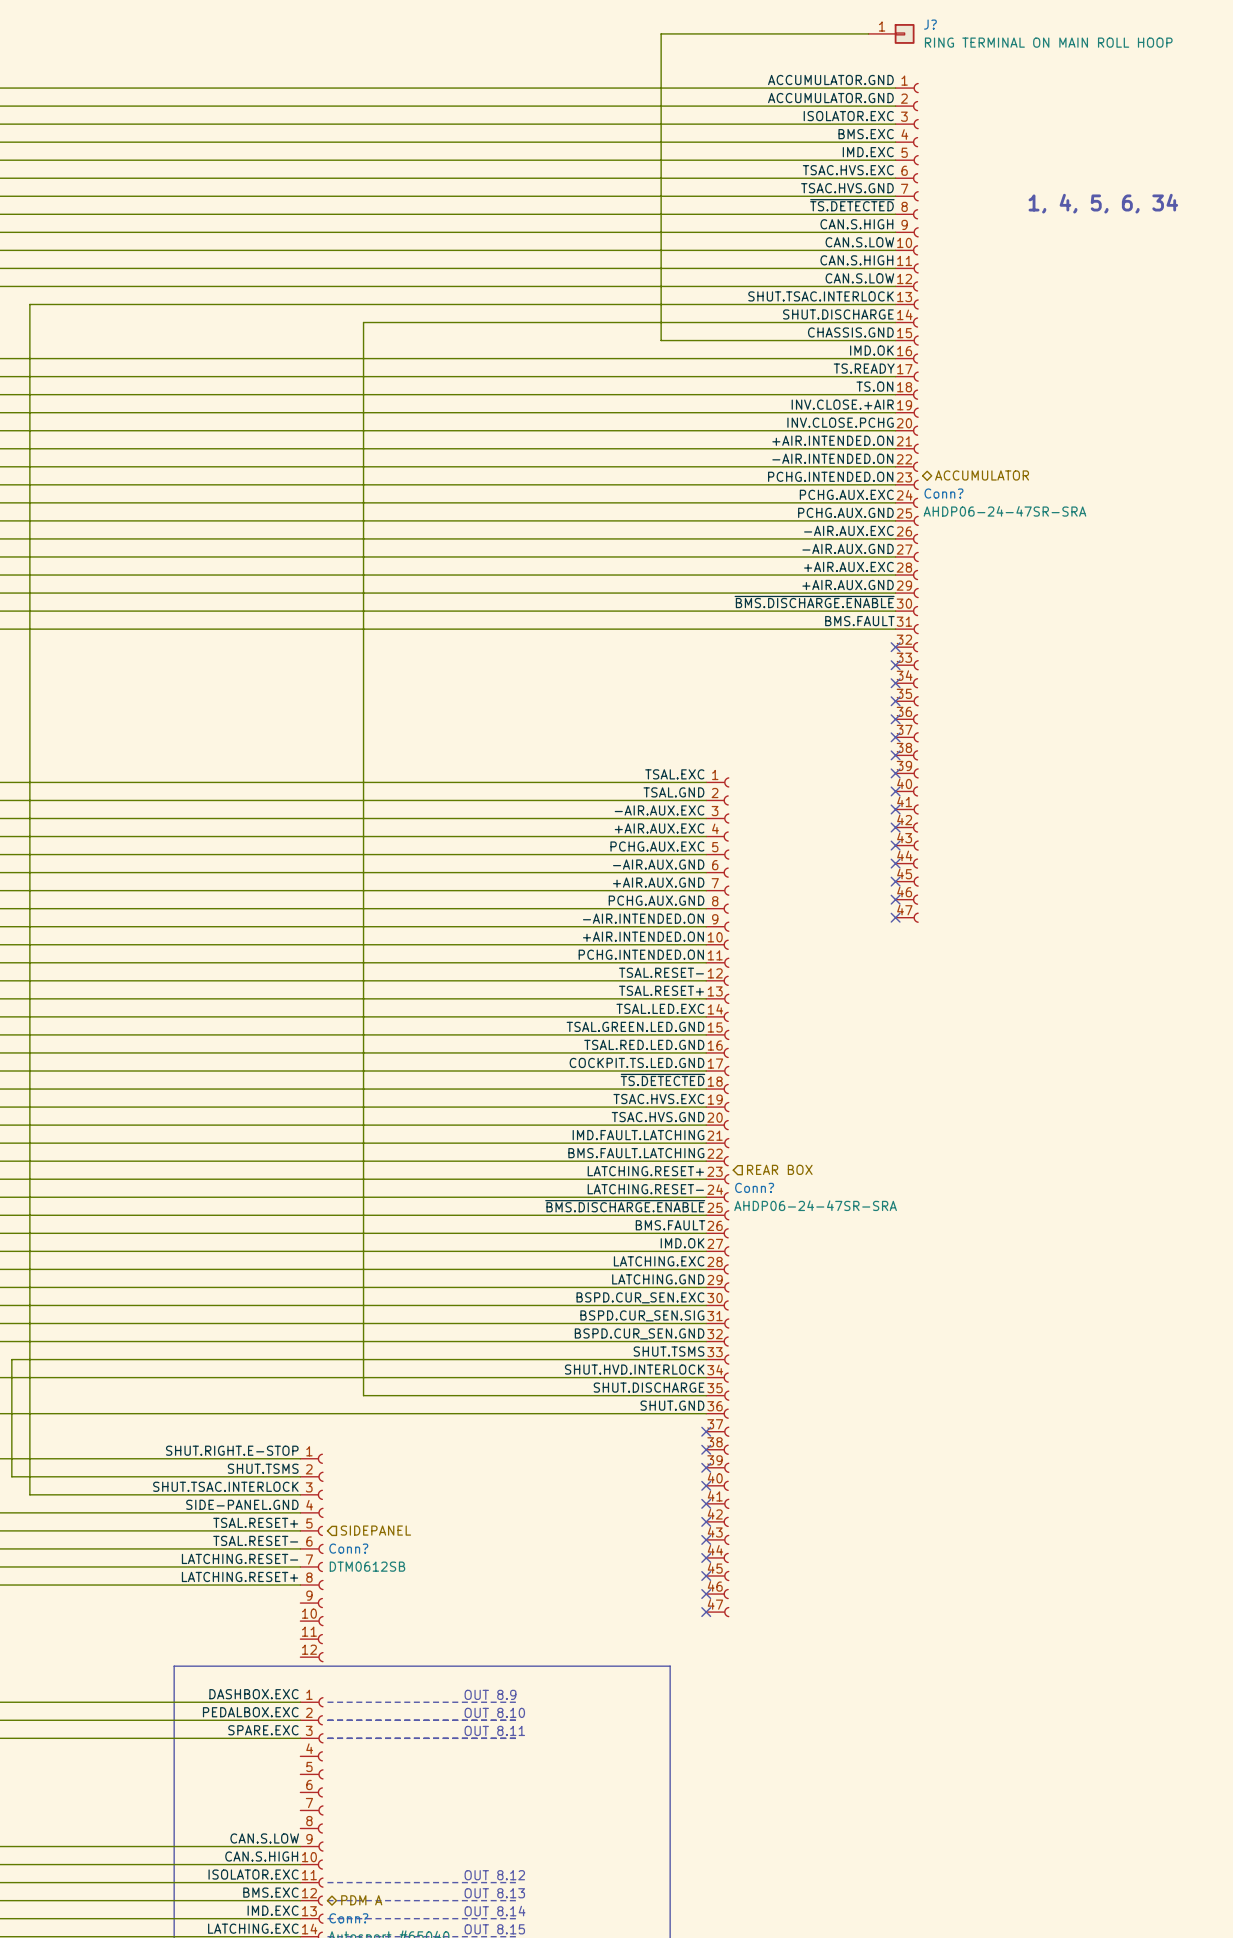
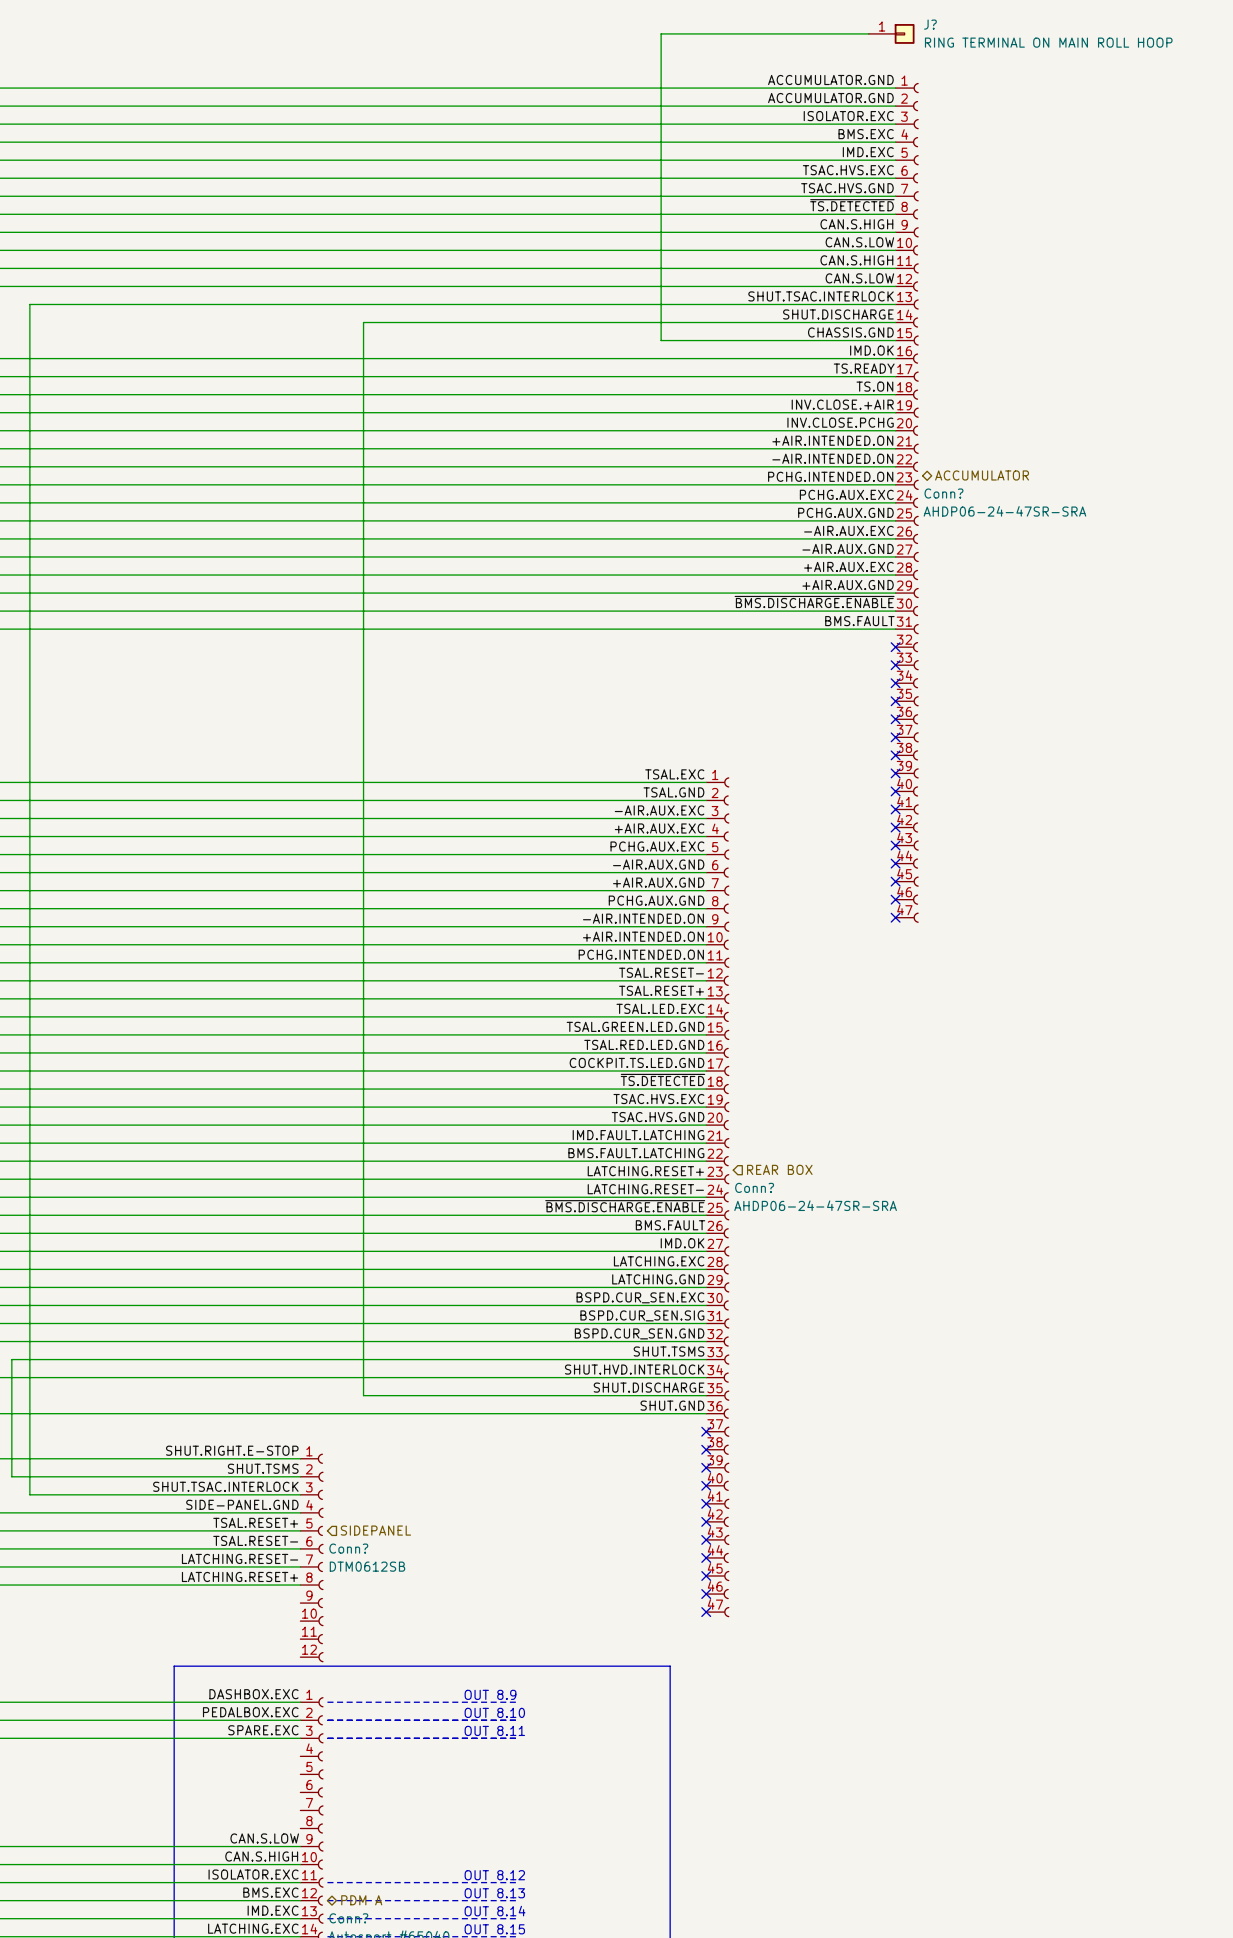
text: 1, 4, 5, 6, 34 (1103, 203) -> none

